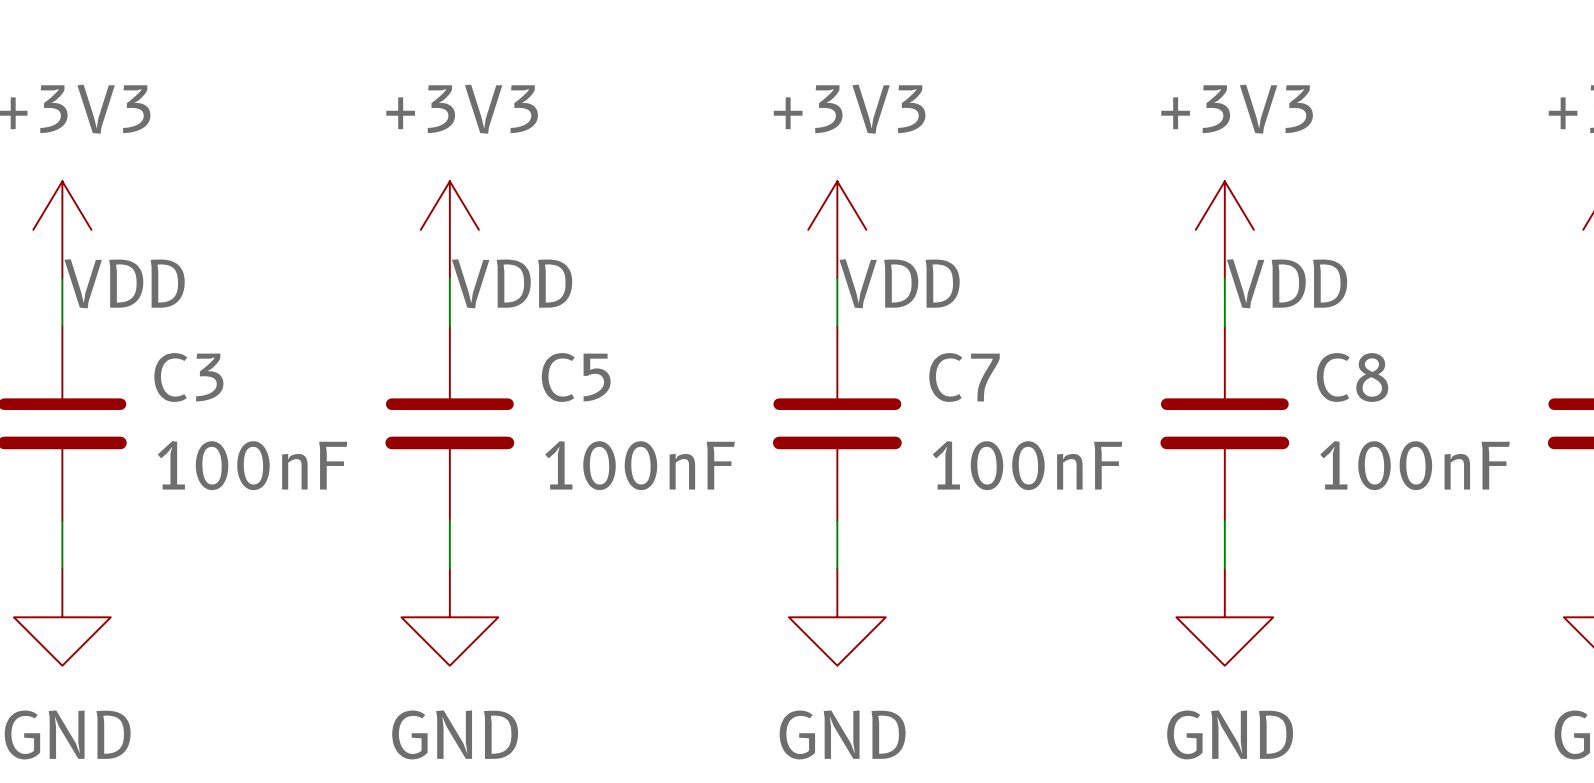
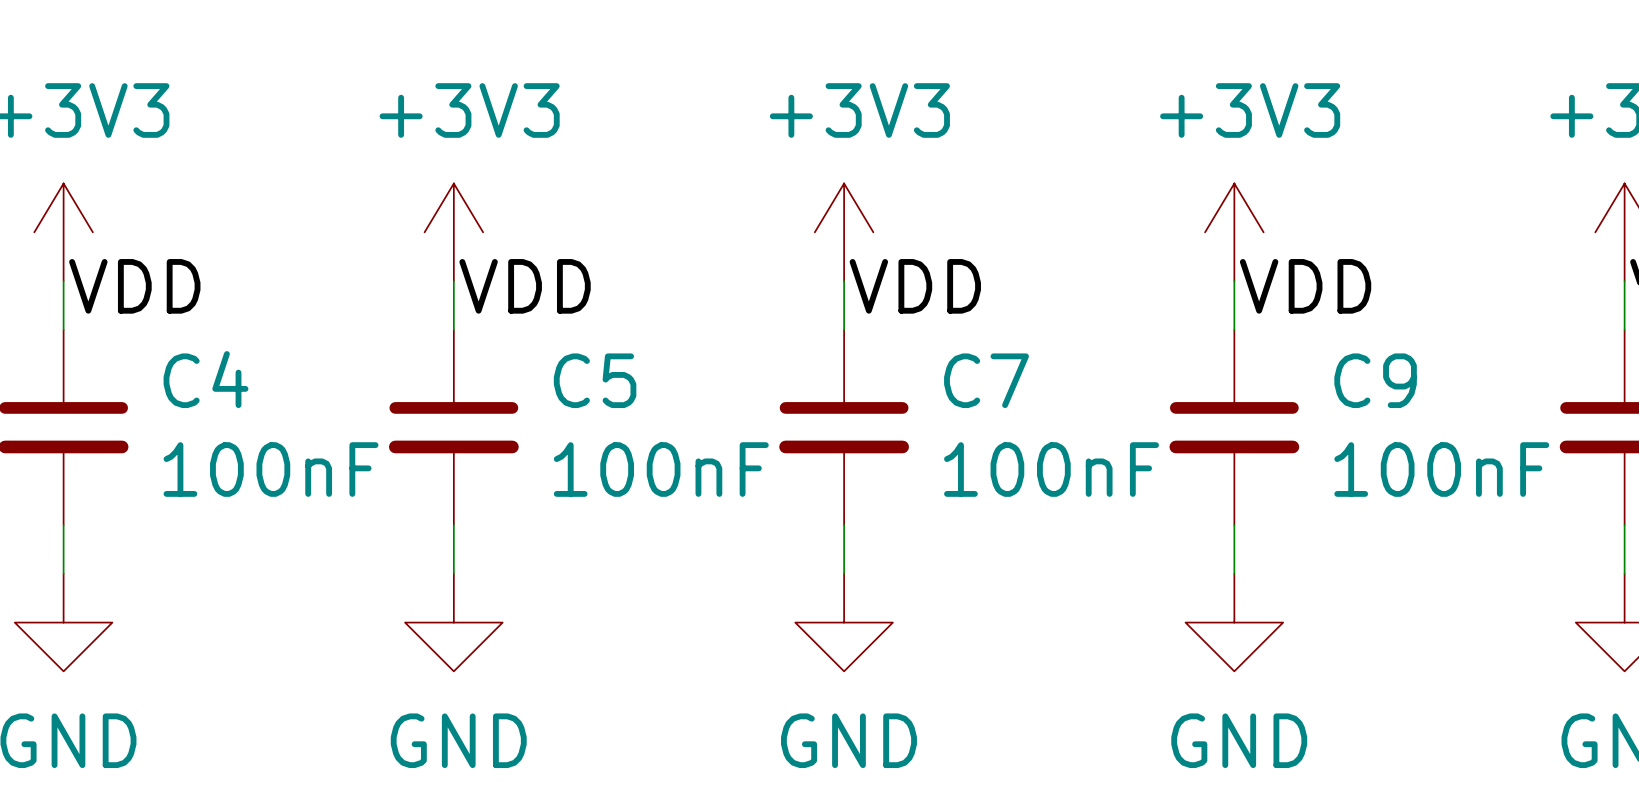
C3 name: C3 (188, 377) -> C4 (205, 379)
C8 name: C8 (1352, 377) -> C9 (1375, 380)

